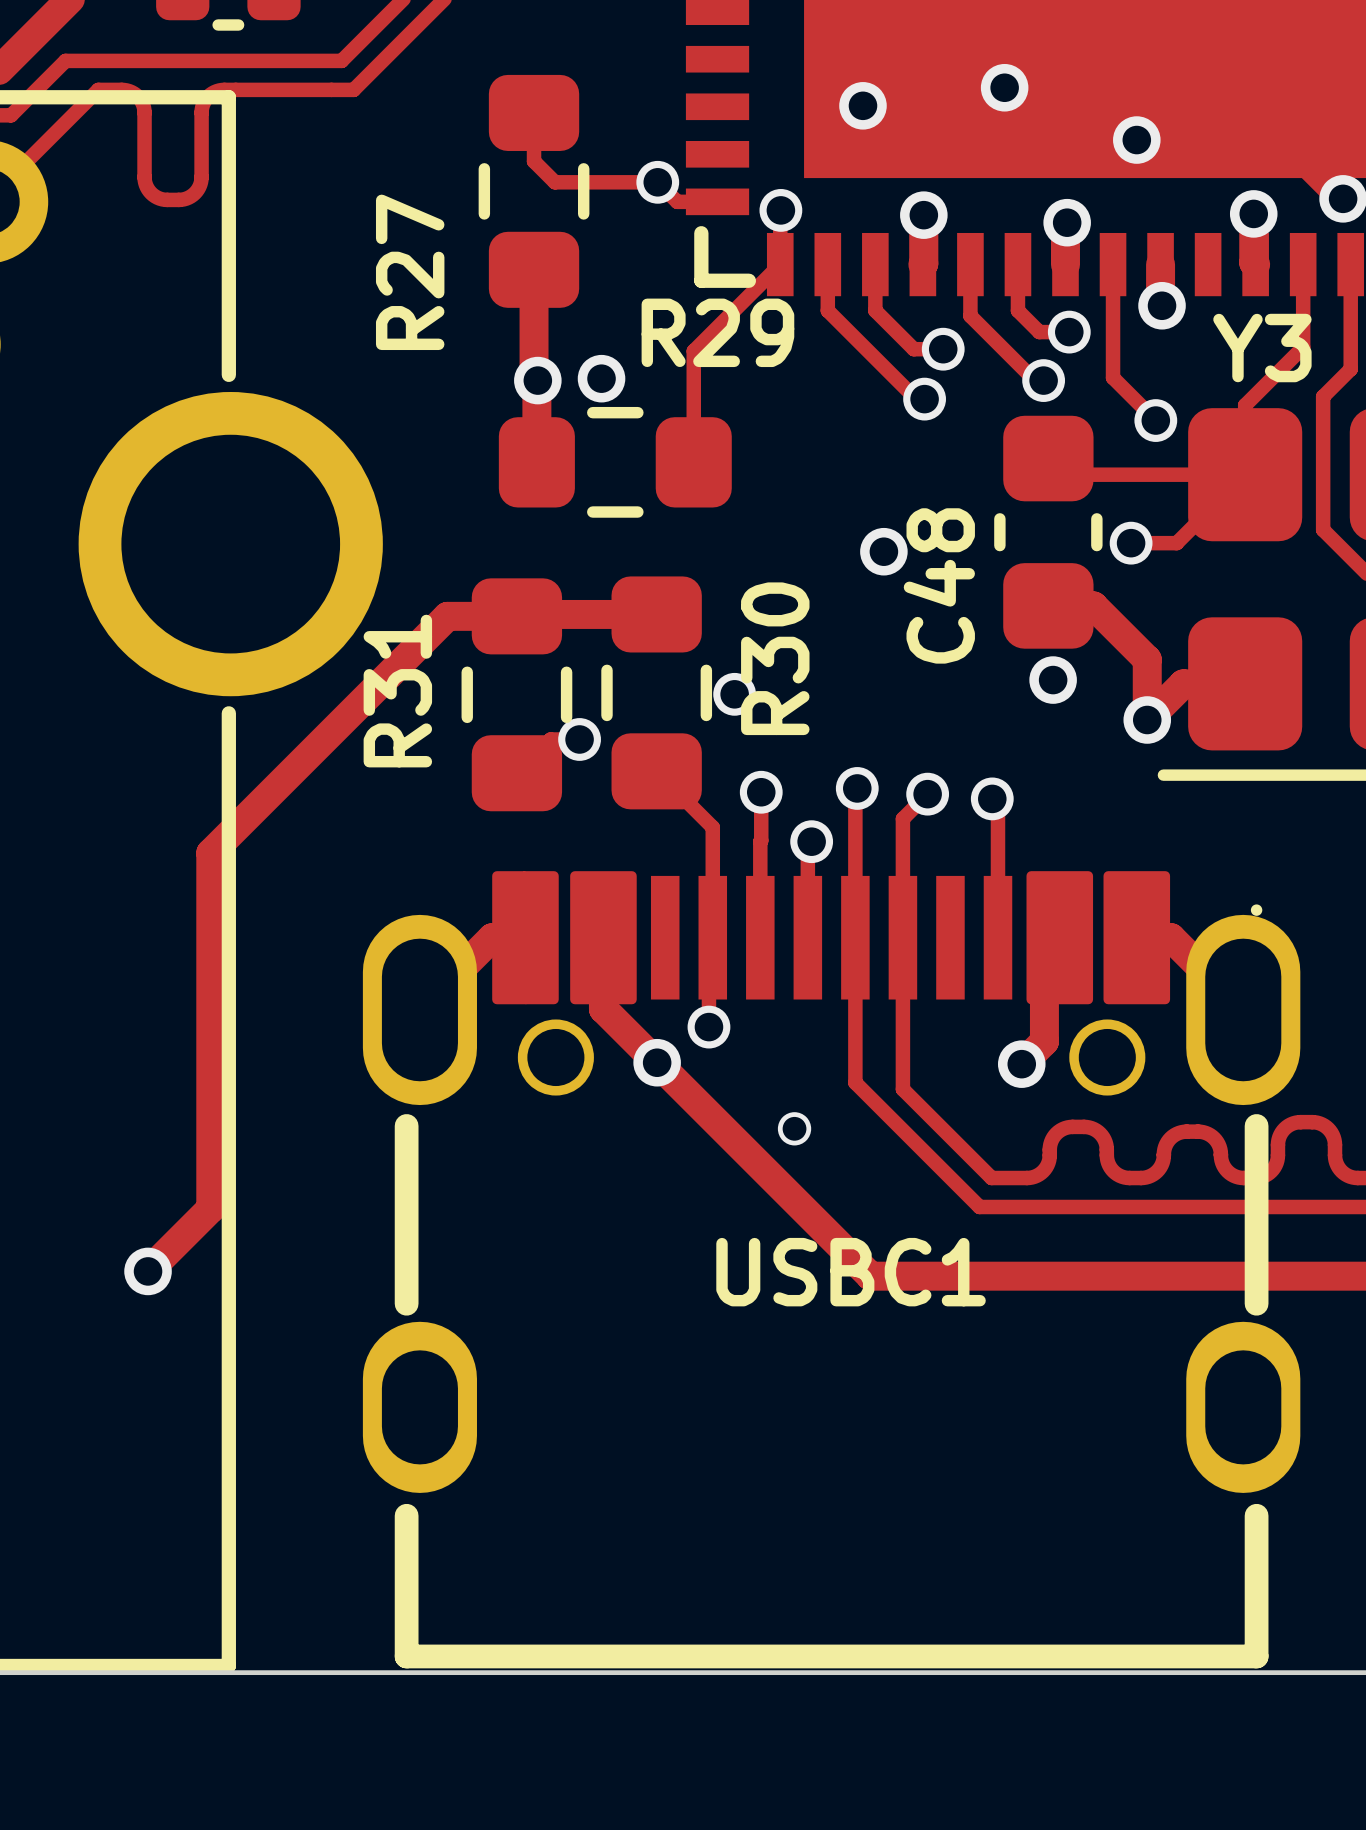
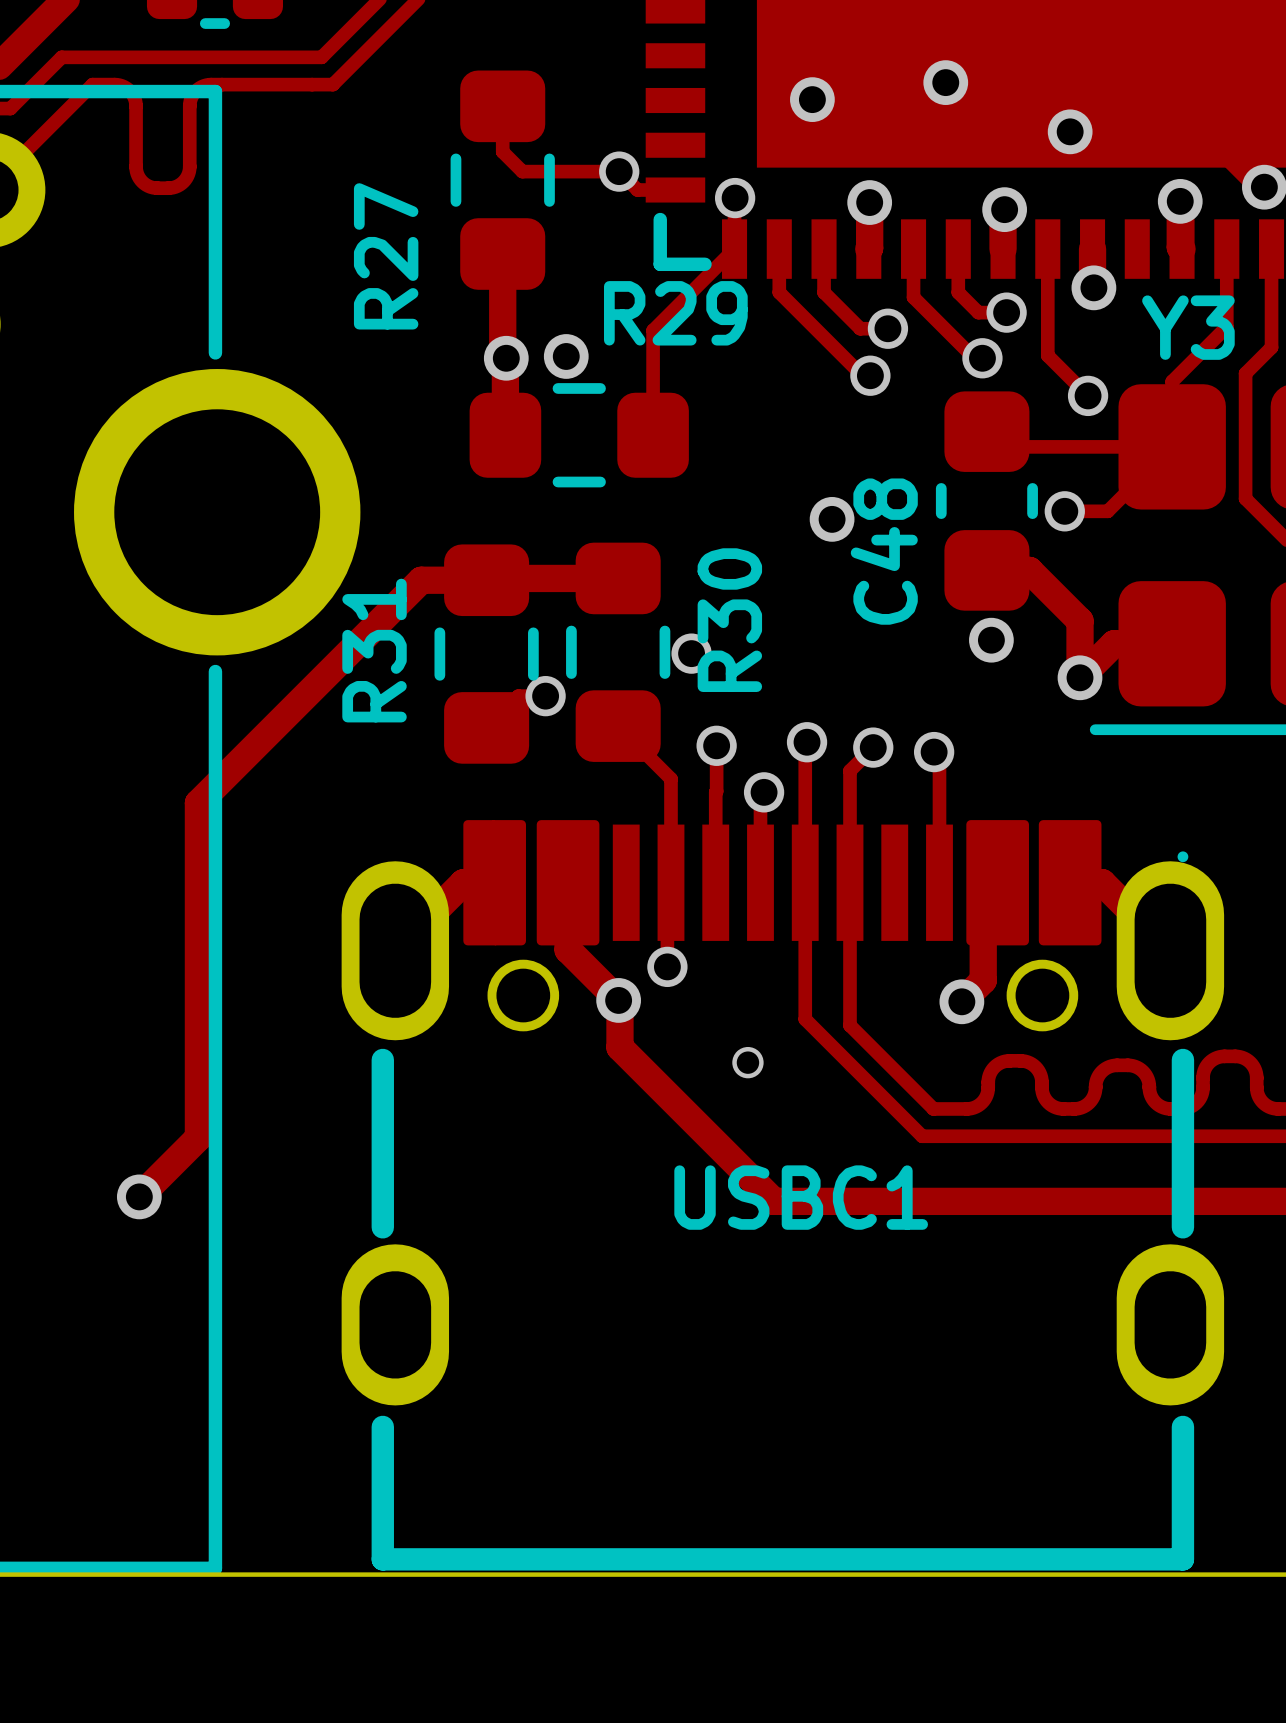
track: (658, 1064) (870, 1276) -> (619, 1001) (619, 1047) (773, 1201) (819, 1201)

